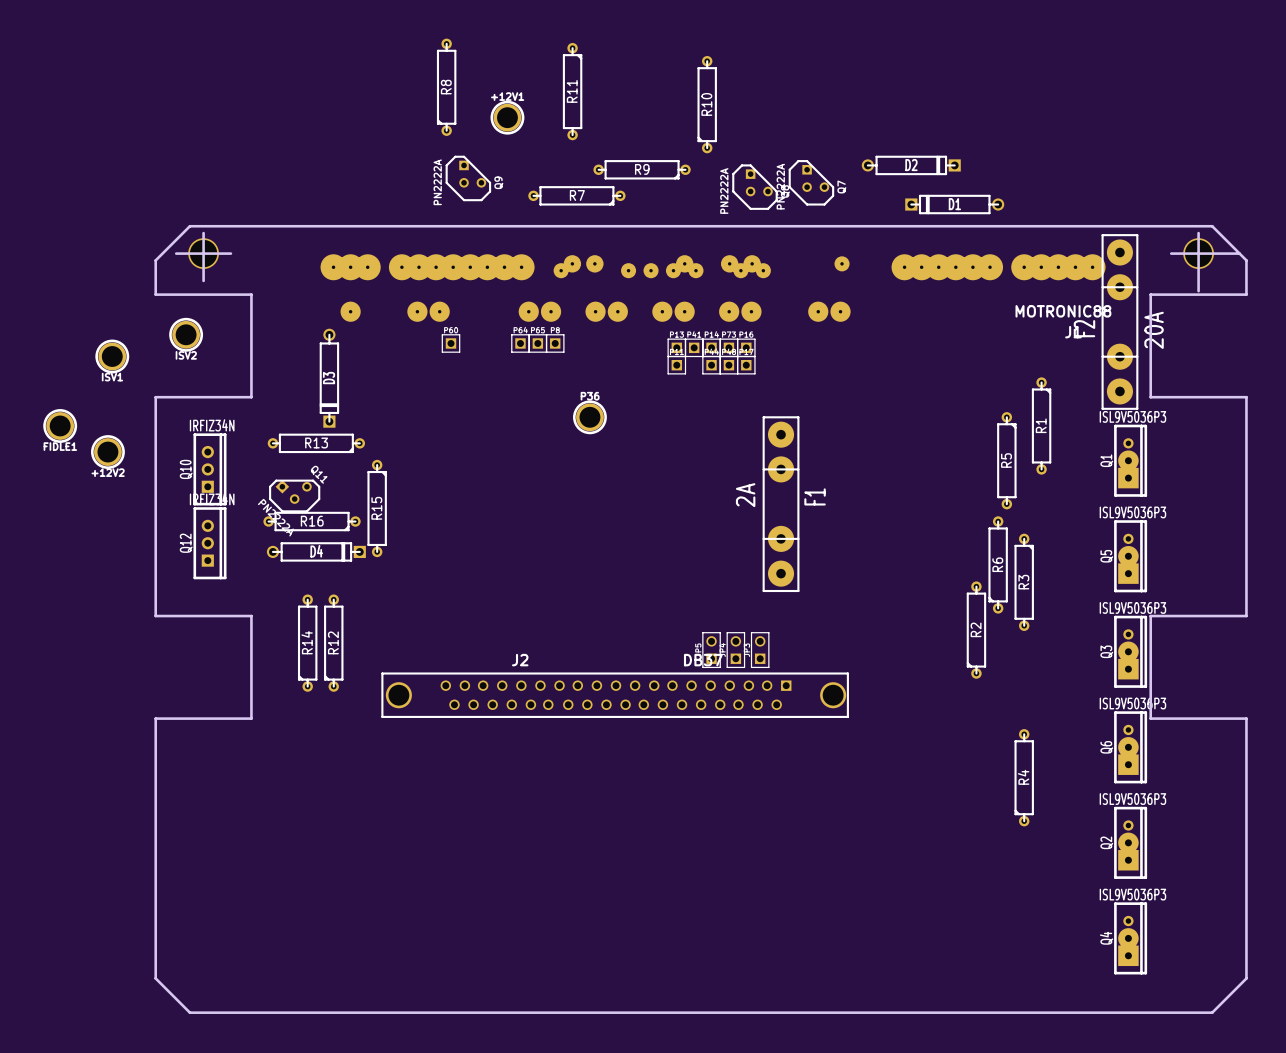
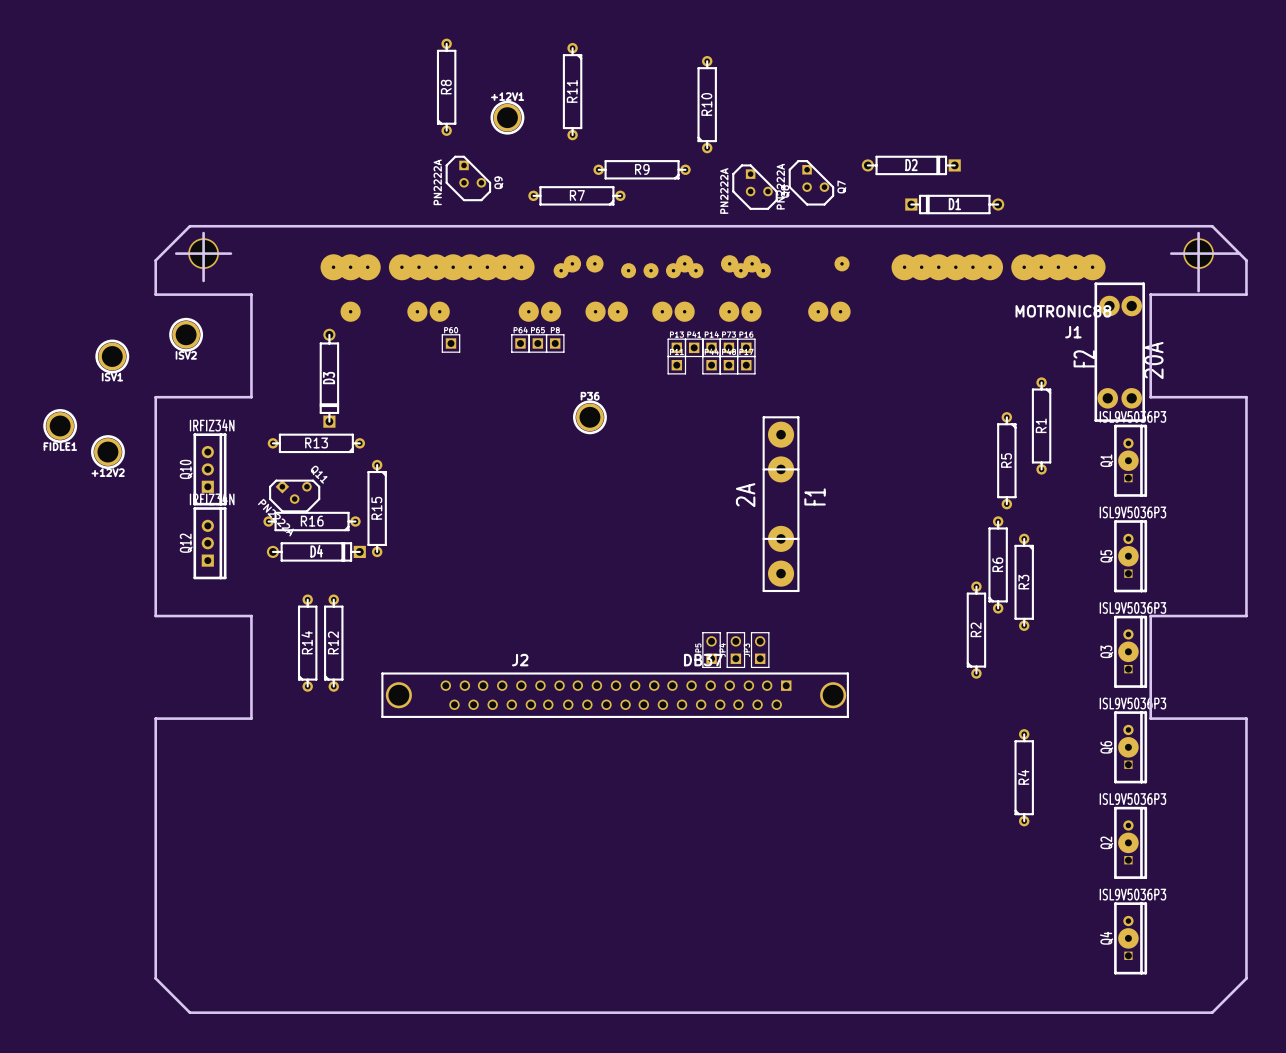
F2 footprint: [1101, 234, 1139, 410] -> [1094, 282, 1145, 422]
Q1 footprint: [1114, 424, 1148, 497] -> [1114, 424, 1148, 497]
Q5 footprint: [1114, 520, 1148, 593] -> [1114, 520, 1148, 593]
Q3 footprint: [1114, 615, 1148, 688] -> [1114, 615, 1148, 688]
Q6 footprint: [1114, 711, 1148, 784] -> [1114, 711, 1148, 784]
Q2 footprint: [1114, 806, 1148, 879] -> [1114, 806, 1148, 879]
Q4 footprint: [1114, 902, 1148, 975] -> [1114, 902, 1148, 975]

